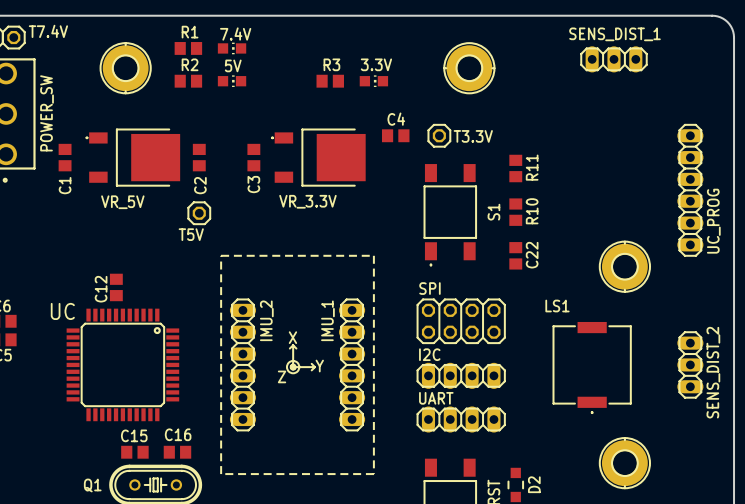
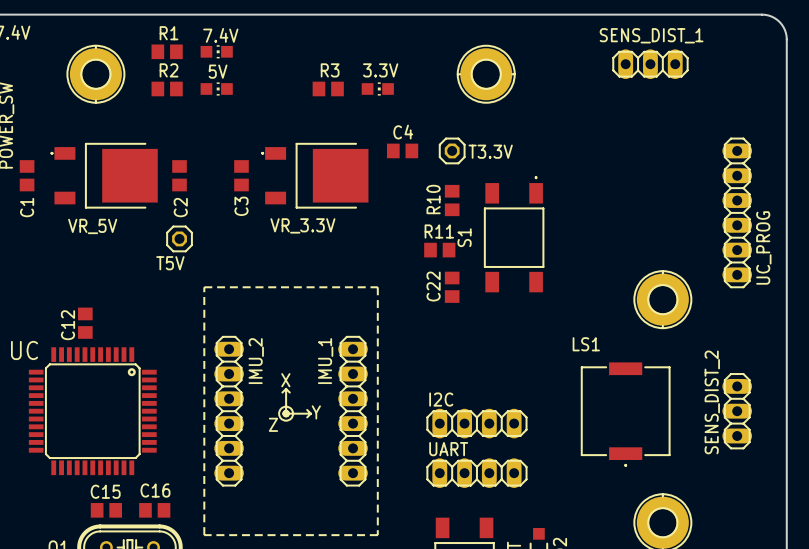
R11 name position: R11 (532, 167) -> R11 (439, 231)
R11 rotation: 0° (515, 168) -> 90° clockwise (439, 250)
R11 position: (515, 168) -> (439, 250)
R10 name position: R10 (532, 211) -> R10 (433, 199)
R10 position: (515, 212) -> (452, 200)
S1 rotation: 0° (450, 214) -> 180° (514, 234)
C22 position: (515, 255) -> (452, 287)
C22 name position: C22 (532, 255) -> C22 (433, 286)
SPI: (461, 321) -> none
SENS_DIST_2 name position: SENS_DIST_2 (713, 372) -> SENS_DIST_2 (712, 402)

